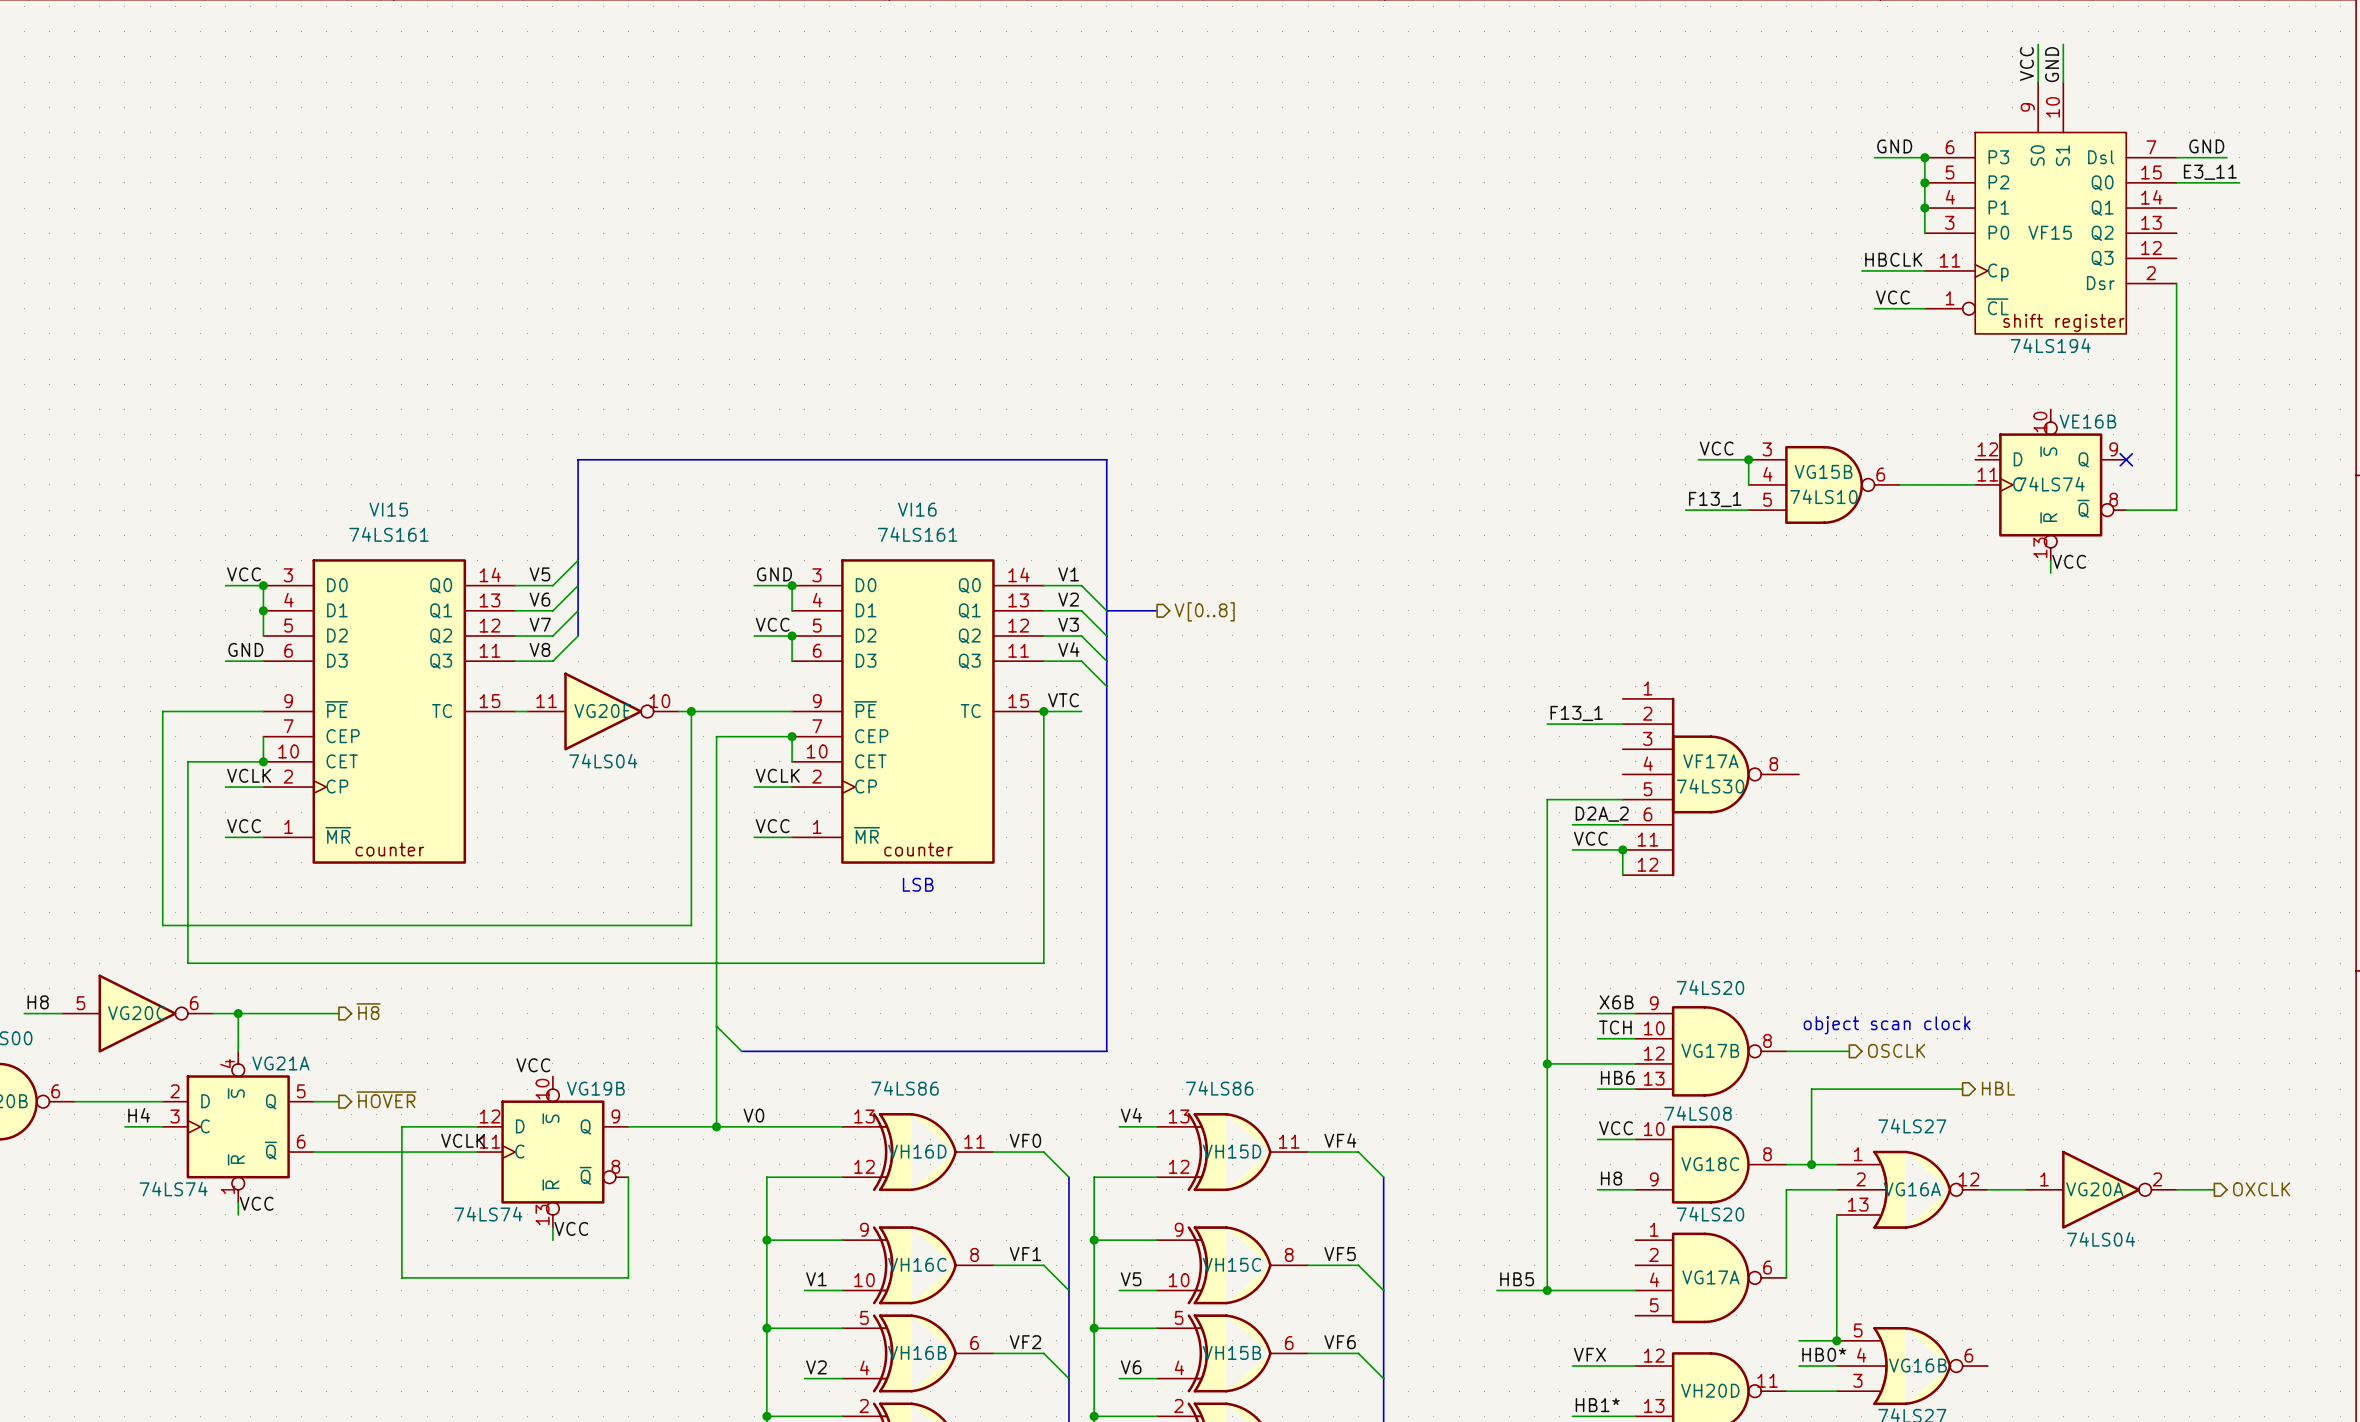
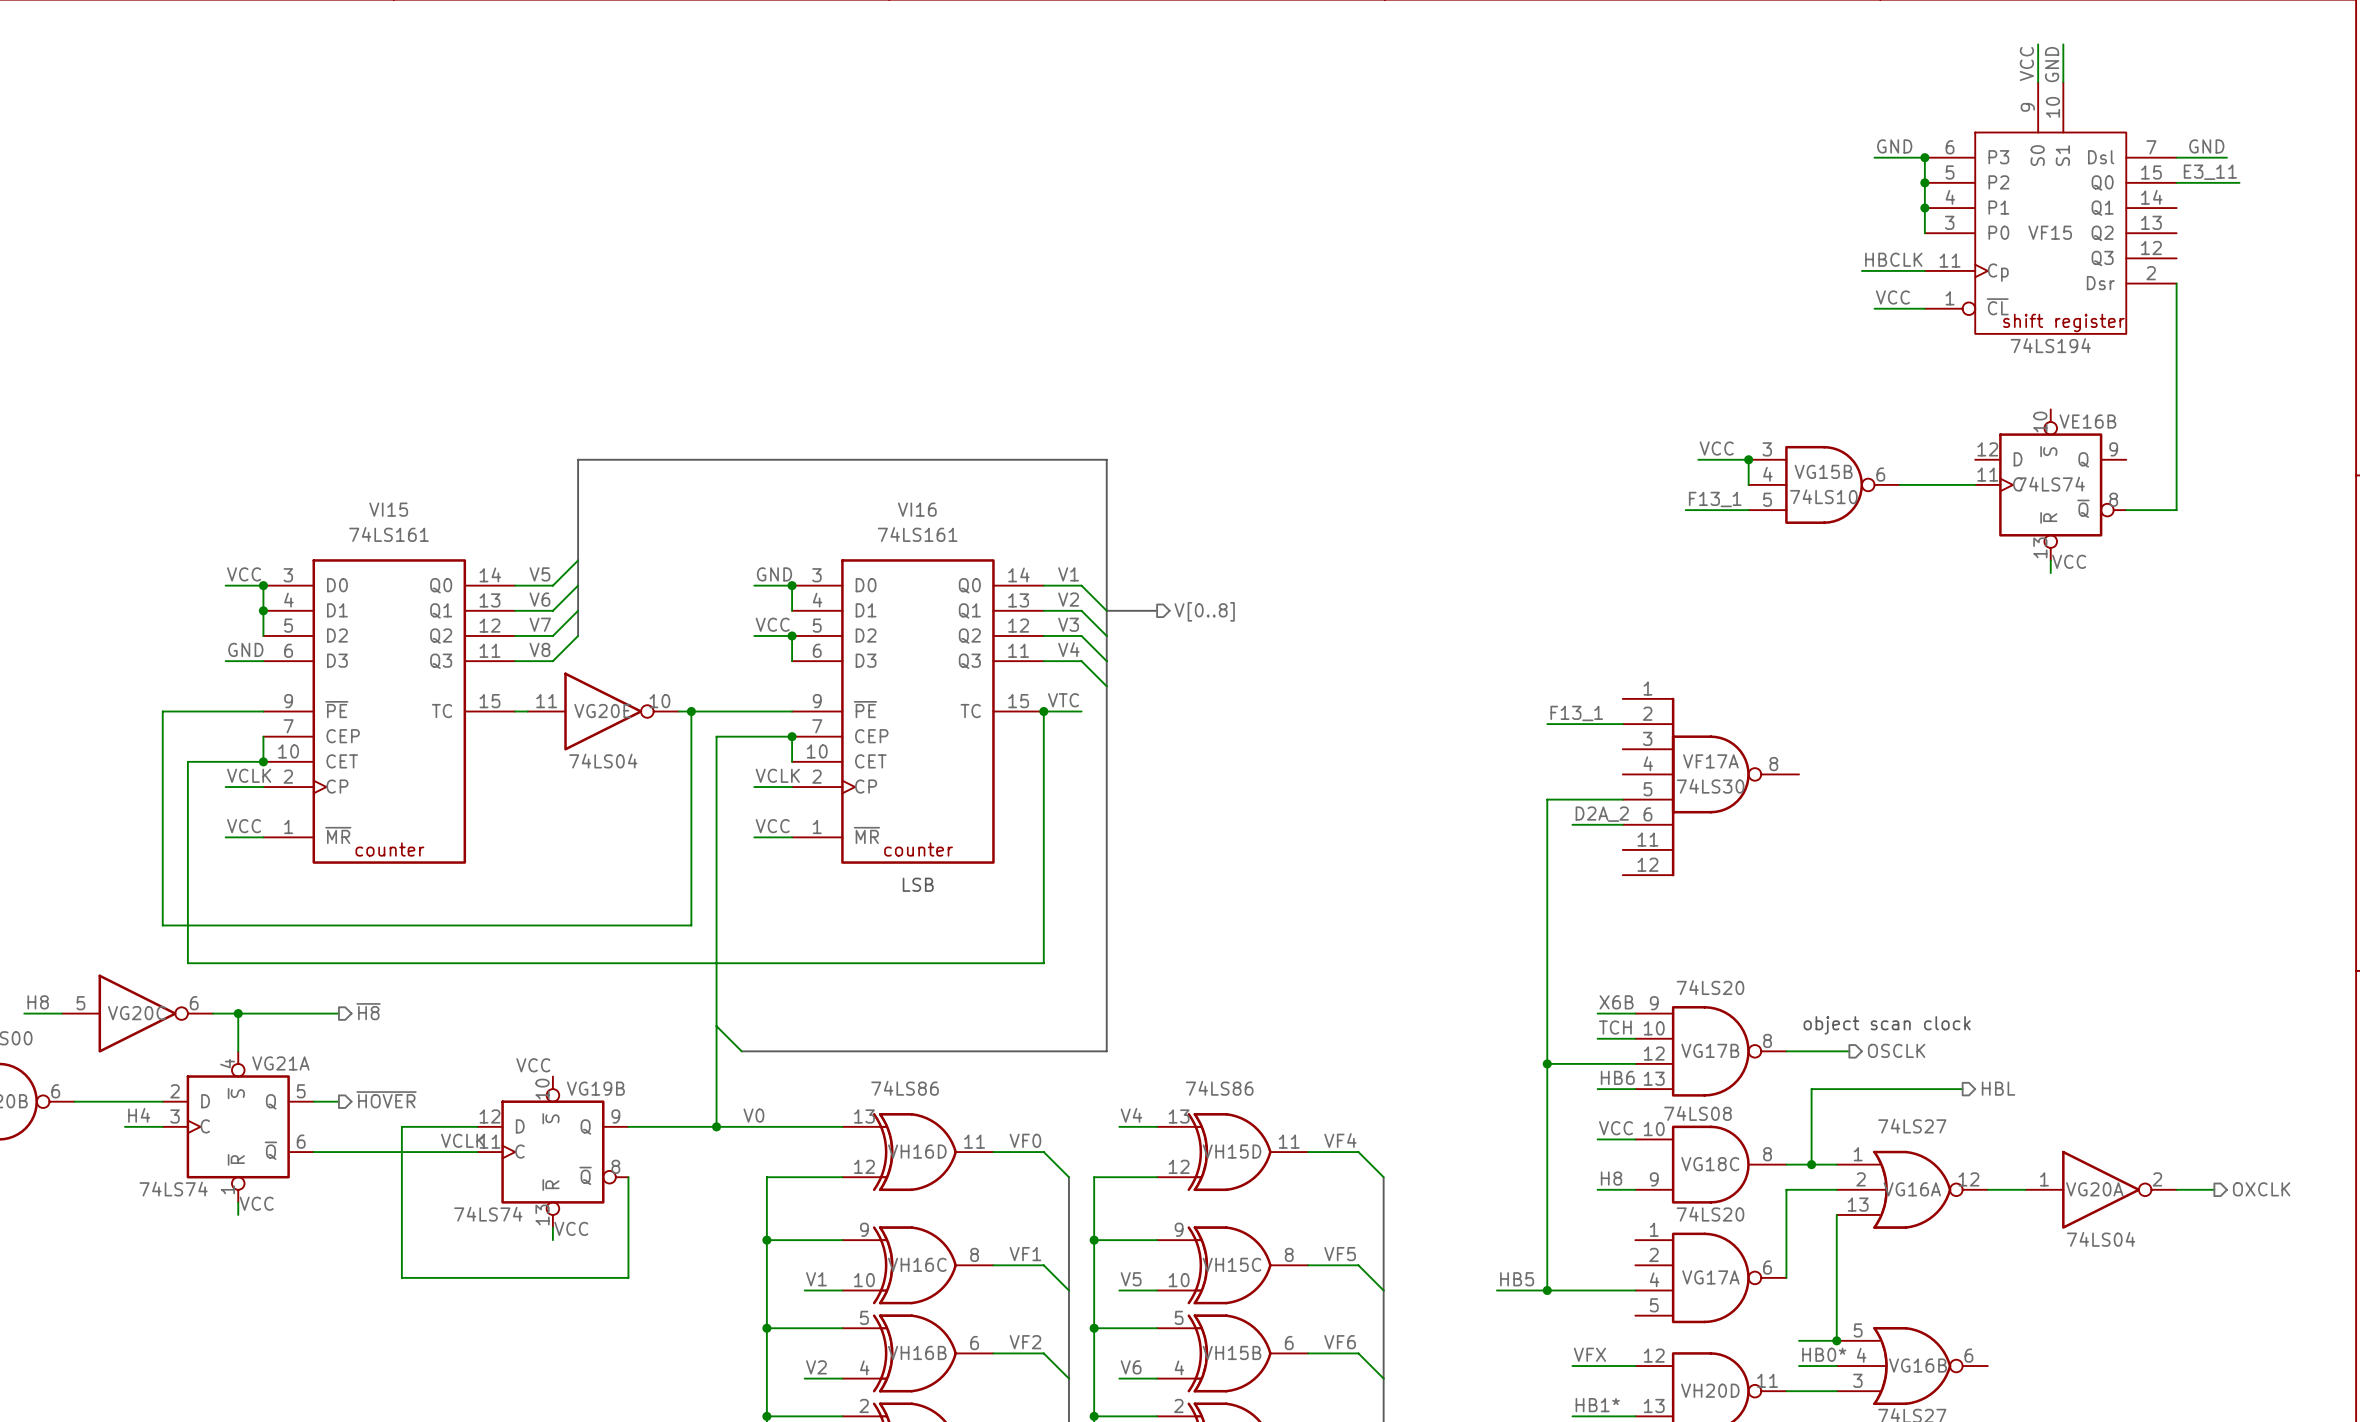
no-connect mark: (2126, 459) -> none
label: VCC (1590, 838) -> none
wire: (1572, 849) (1622, 849) (1622, 875) -> none
junction: (1622, 849) -> none

